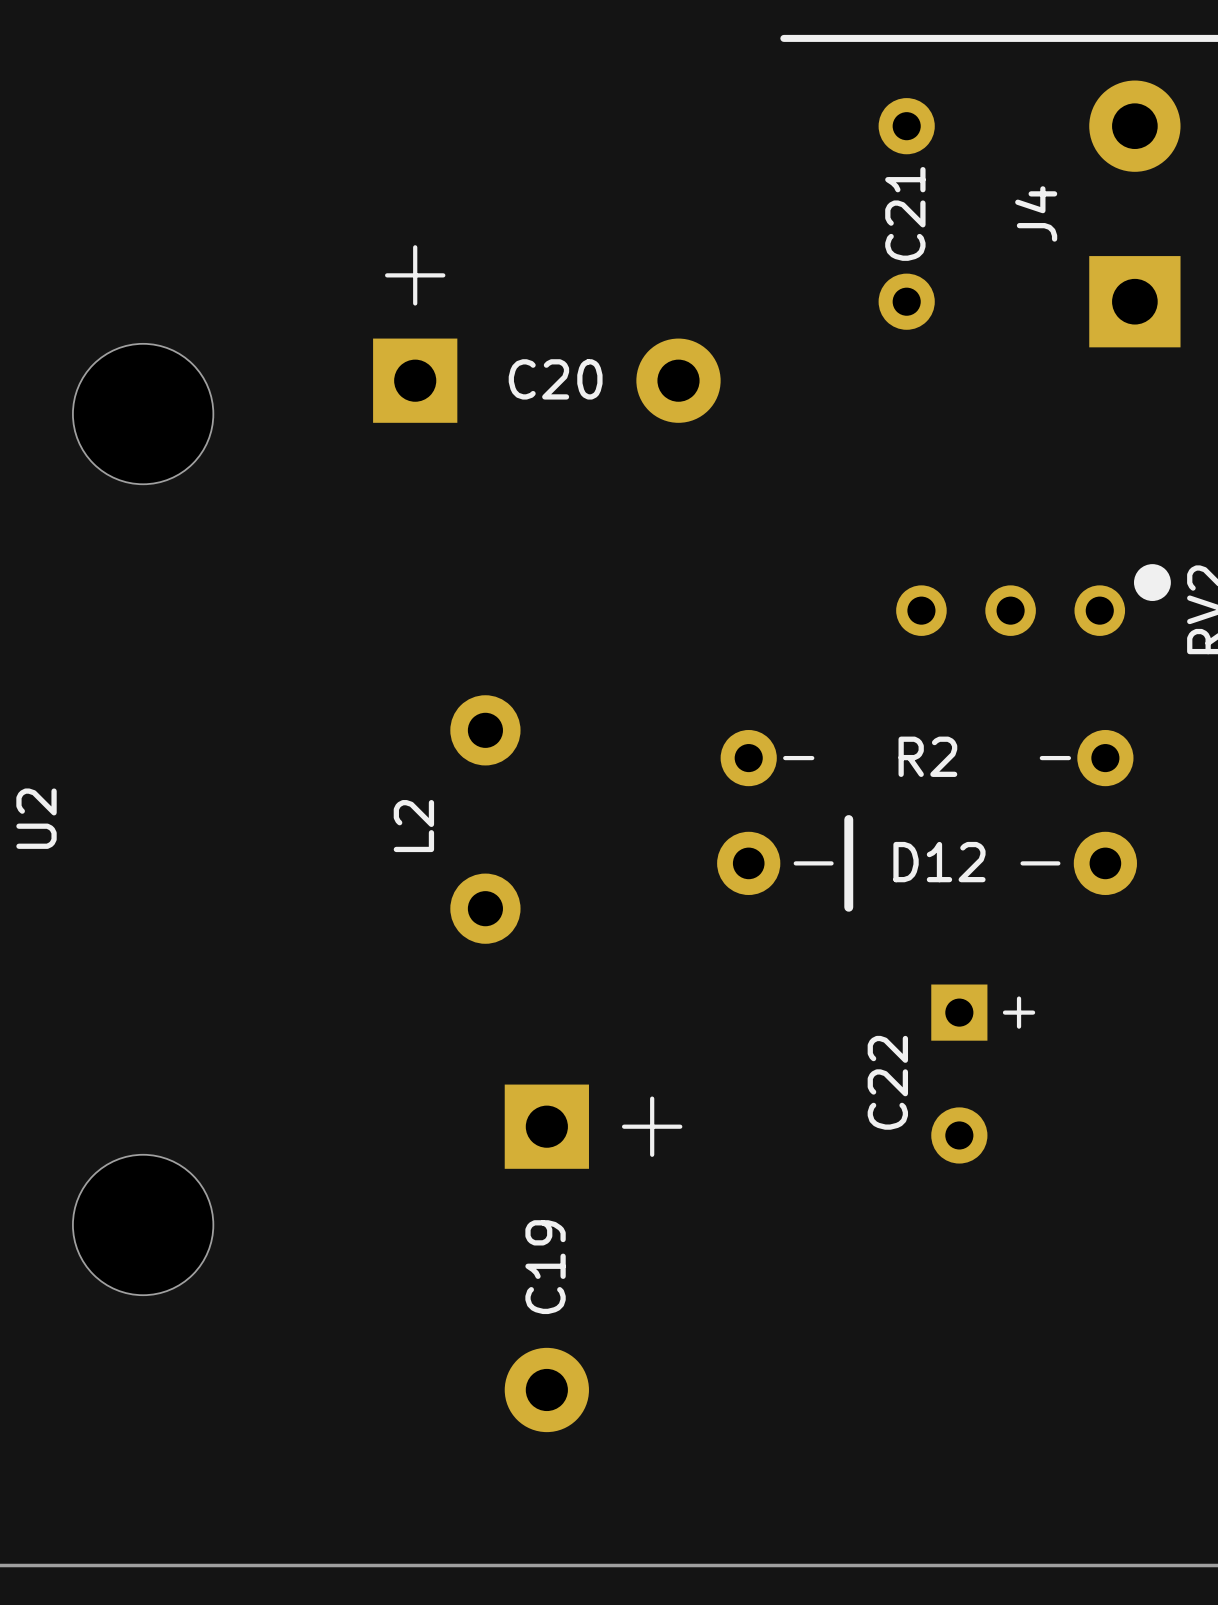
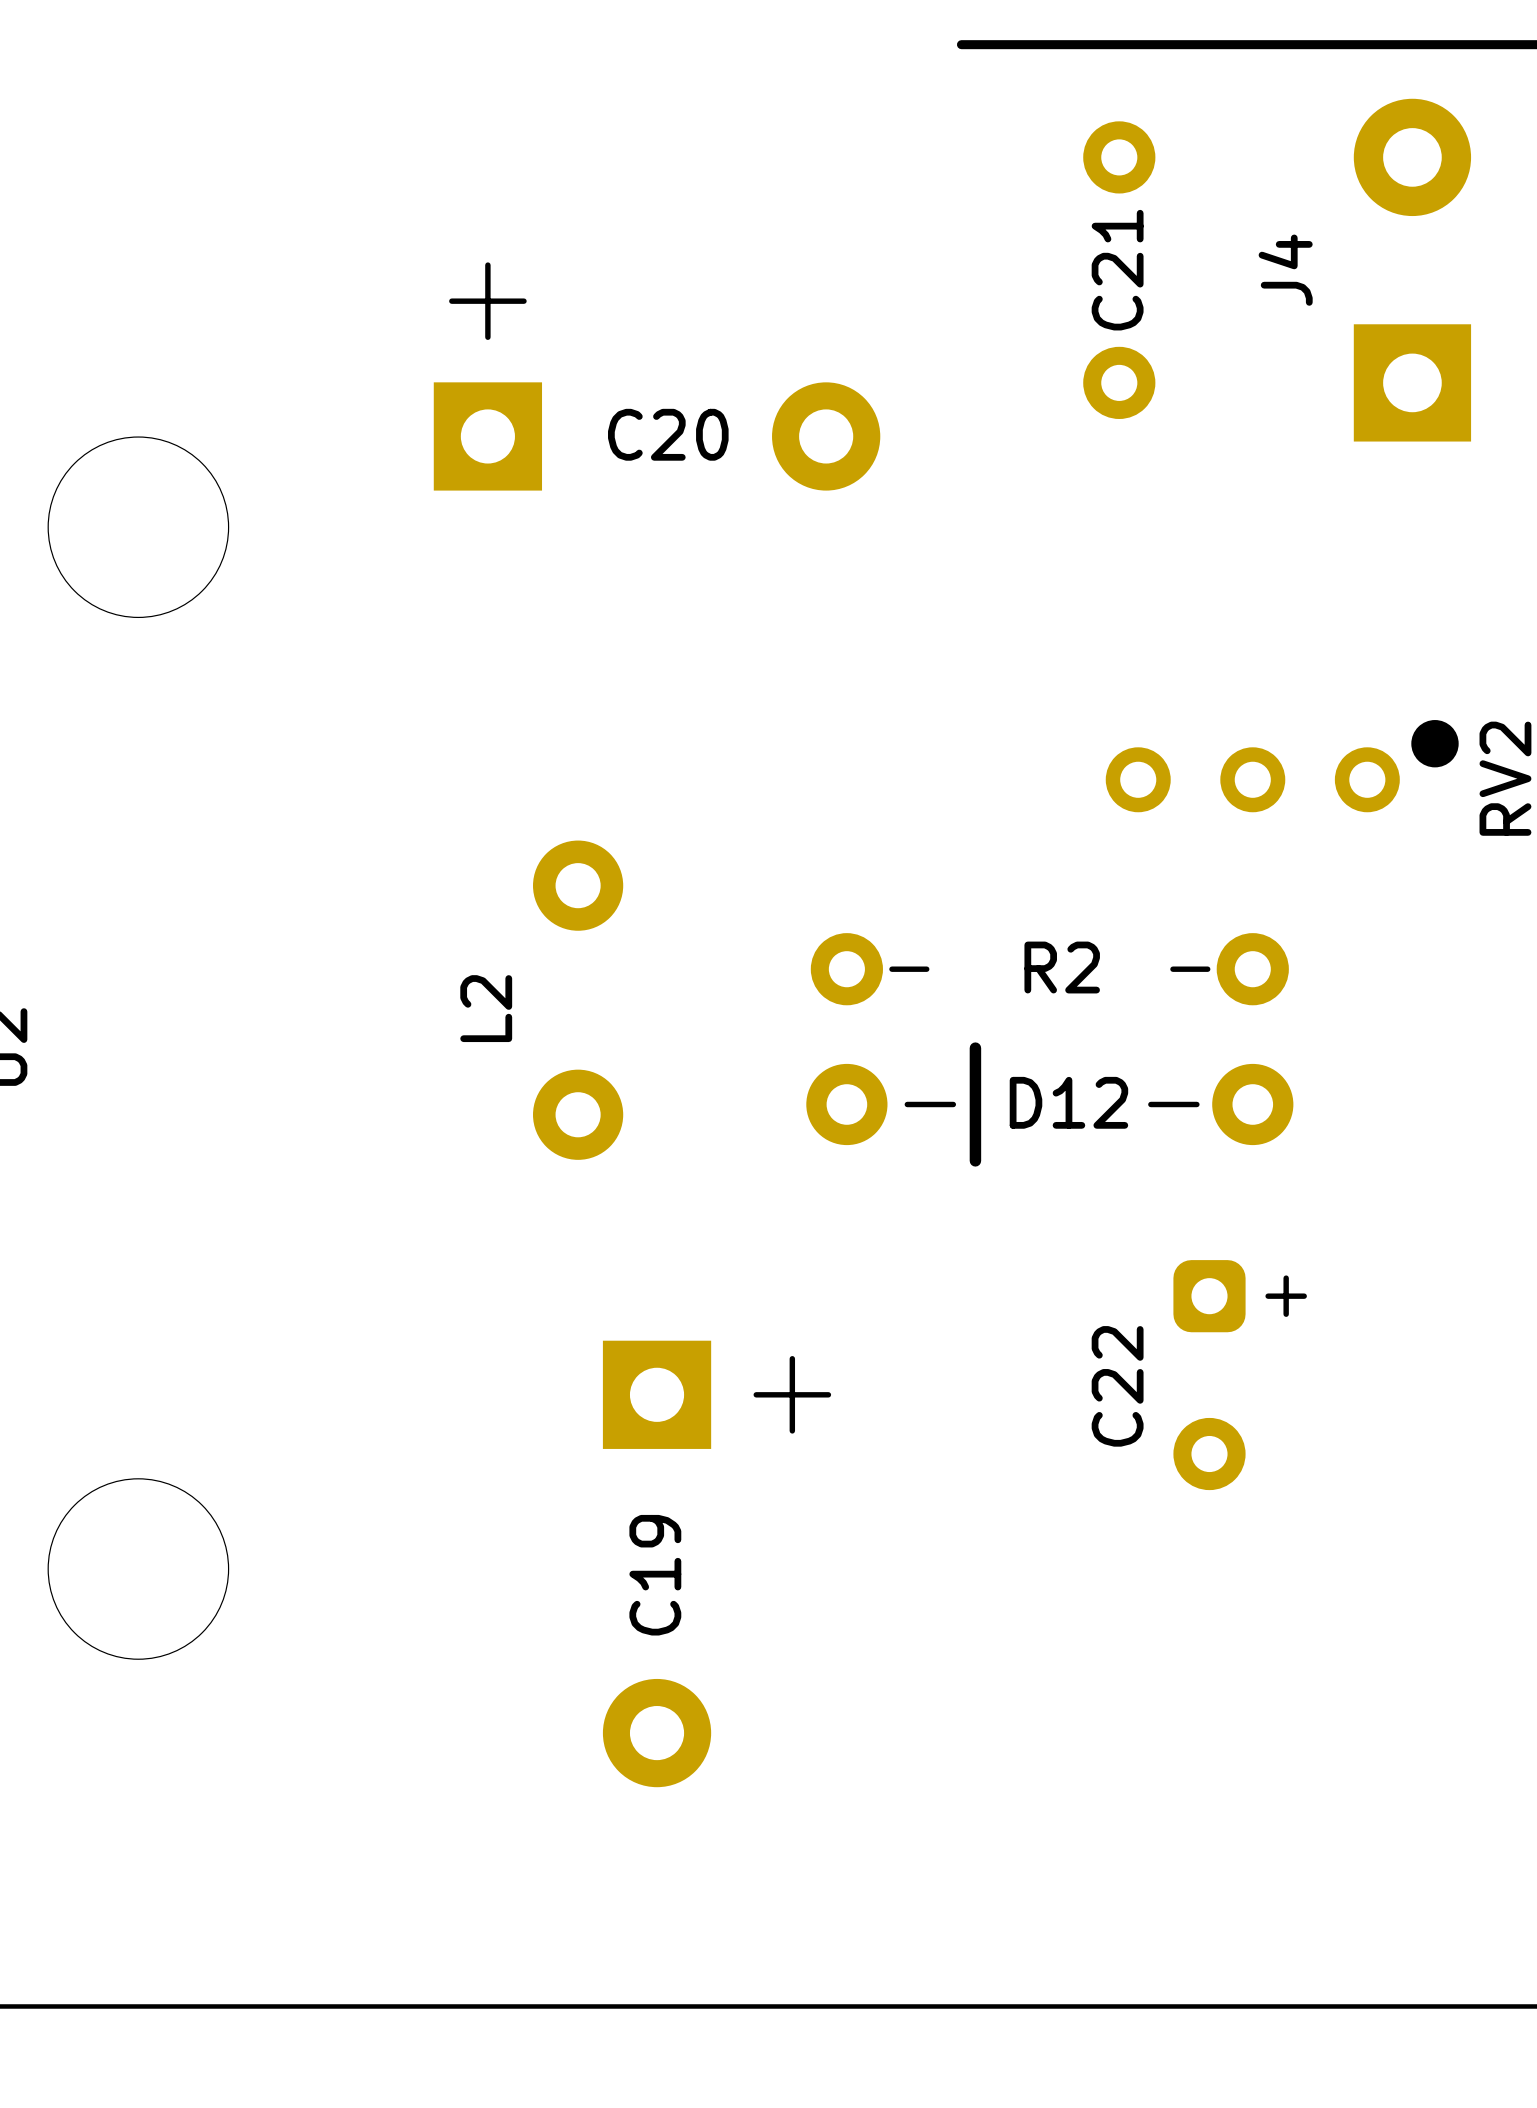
C20 position: (546, 334) -> (657, 376)
R2 footprint: [720, 729, 1134, 787] -> [810, 933, 1289, 1006]
D12 footprint: [717, 815, 1137, 912] -> [806, 1042, 1294, 1167]
L2 position: (485, 819) -> (578, 1000)
C22 footprint: [931, 984, 1036, 1164] -> [1173, 1260, 1307, 1491]
C19 position: (593, 1258) -> (717, 1563)

